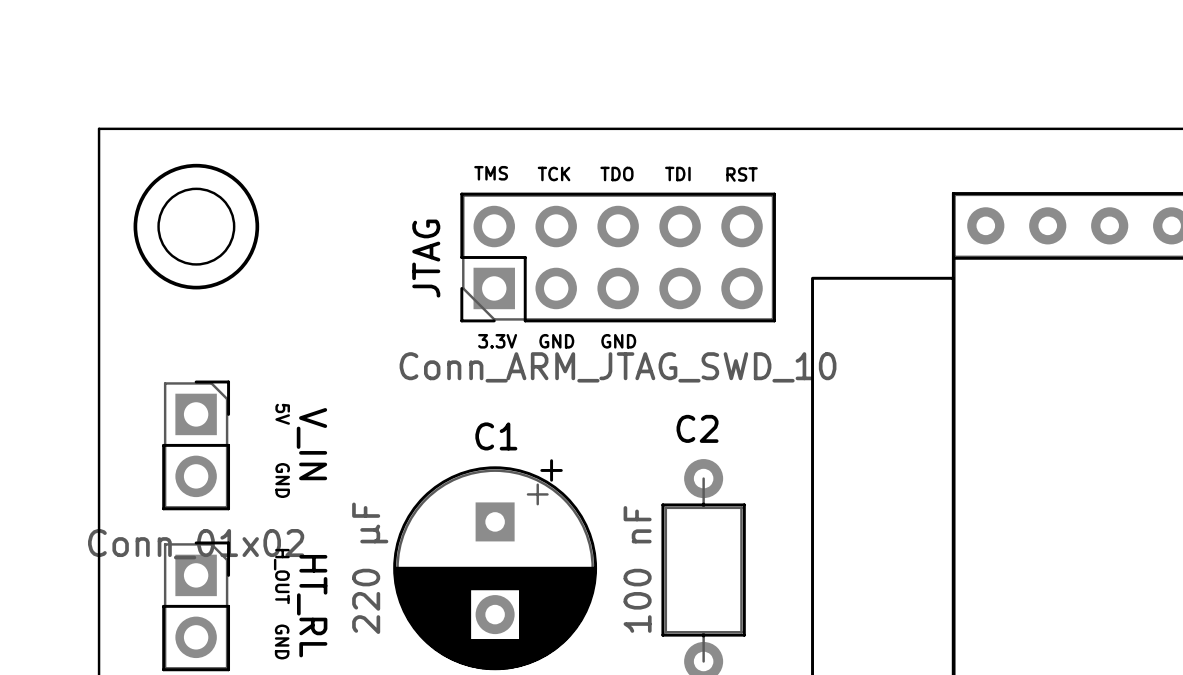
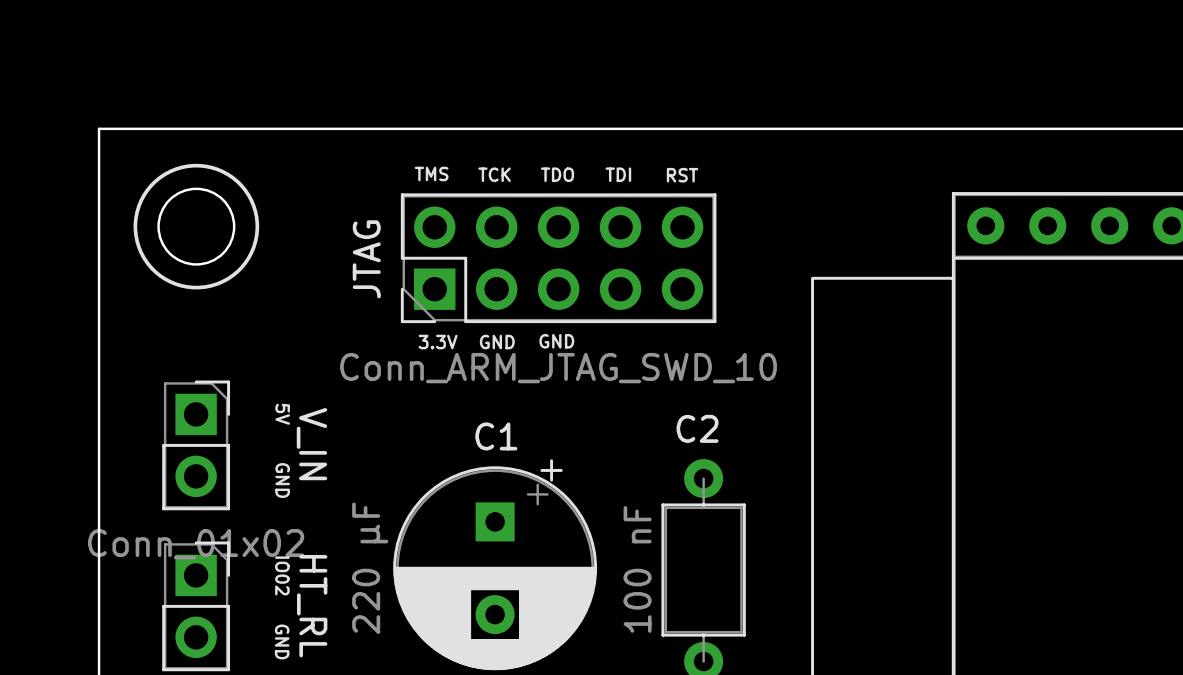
text position: TMS (491, 173) -> TMS (431, 173)
text position: TCK (554, 173) -> TCK (494, 174)
text: TDO (616, 173) -> TDI (618, 174)
text: TDI (677, 173) -> none
text: none -> TDO (557, 174)
text position: RST (742, 174) -> RST (682, 175)
JTAG position: (618, 257) -> (558, 258)
text: 3.3V (497, 341) -> GND (497, 342)
text: GND (618, 341) -> none
text: none -> 3.3V (438, 342)
text: H_OUT (281, 576) -> IO02 (282, 575)

